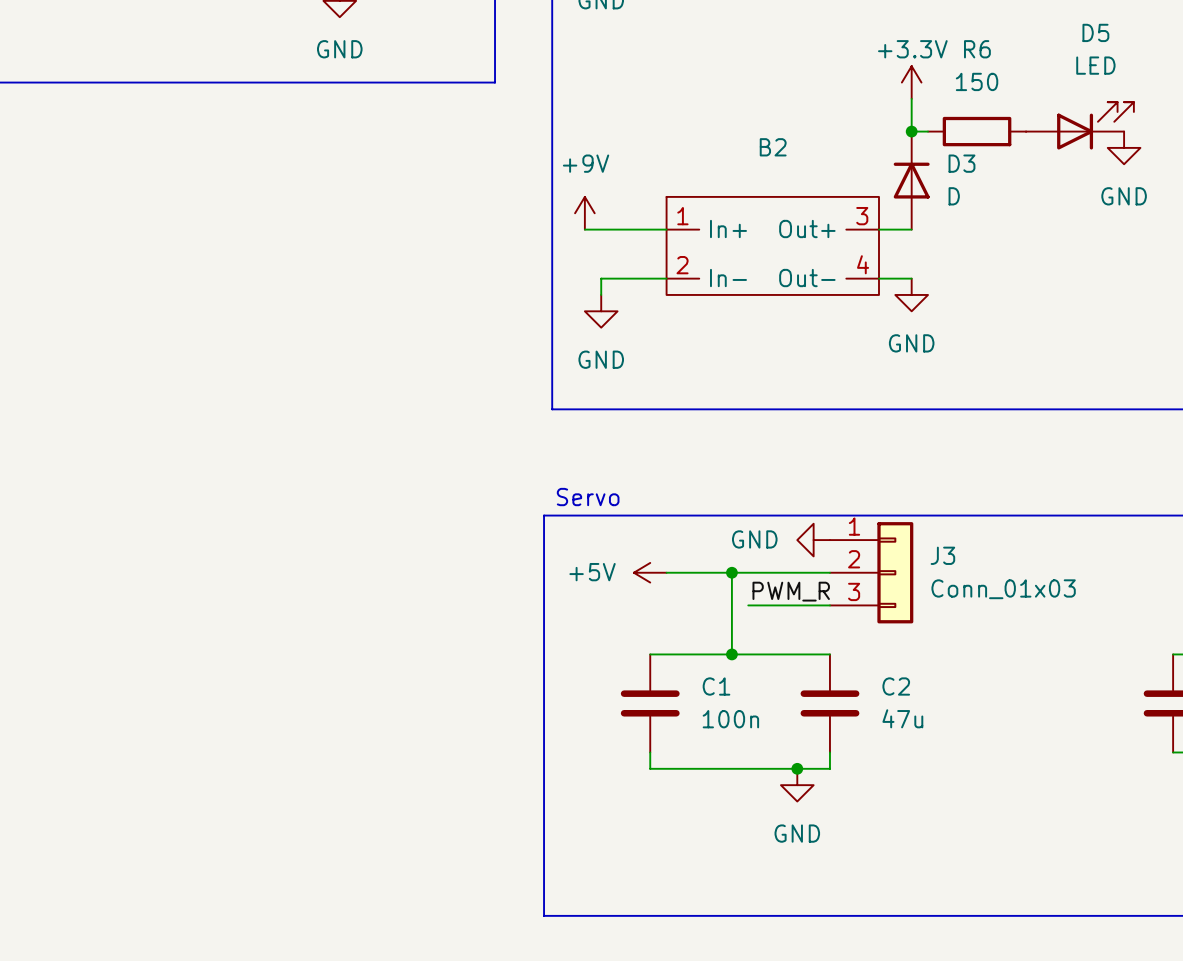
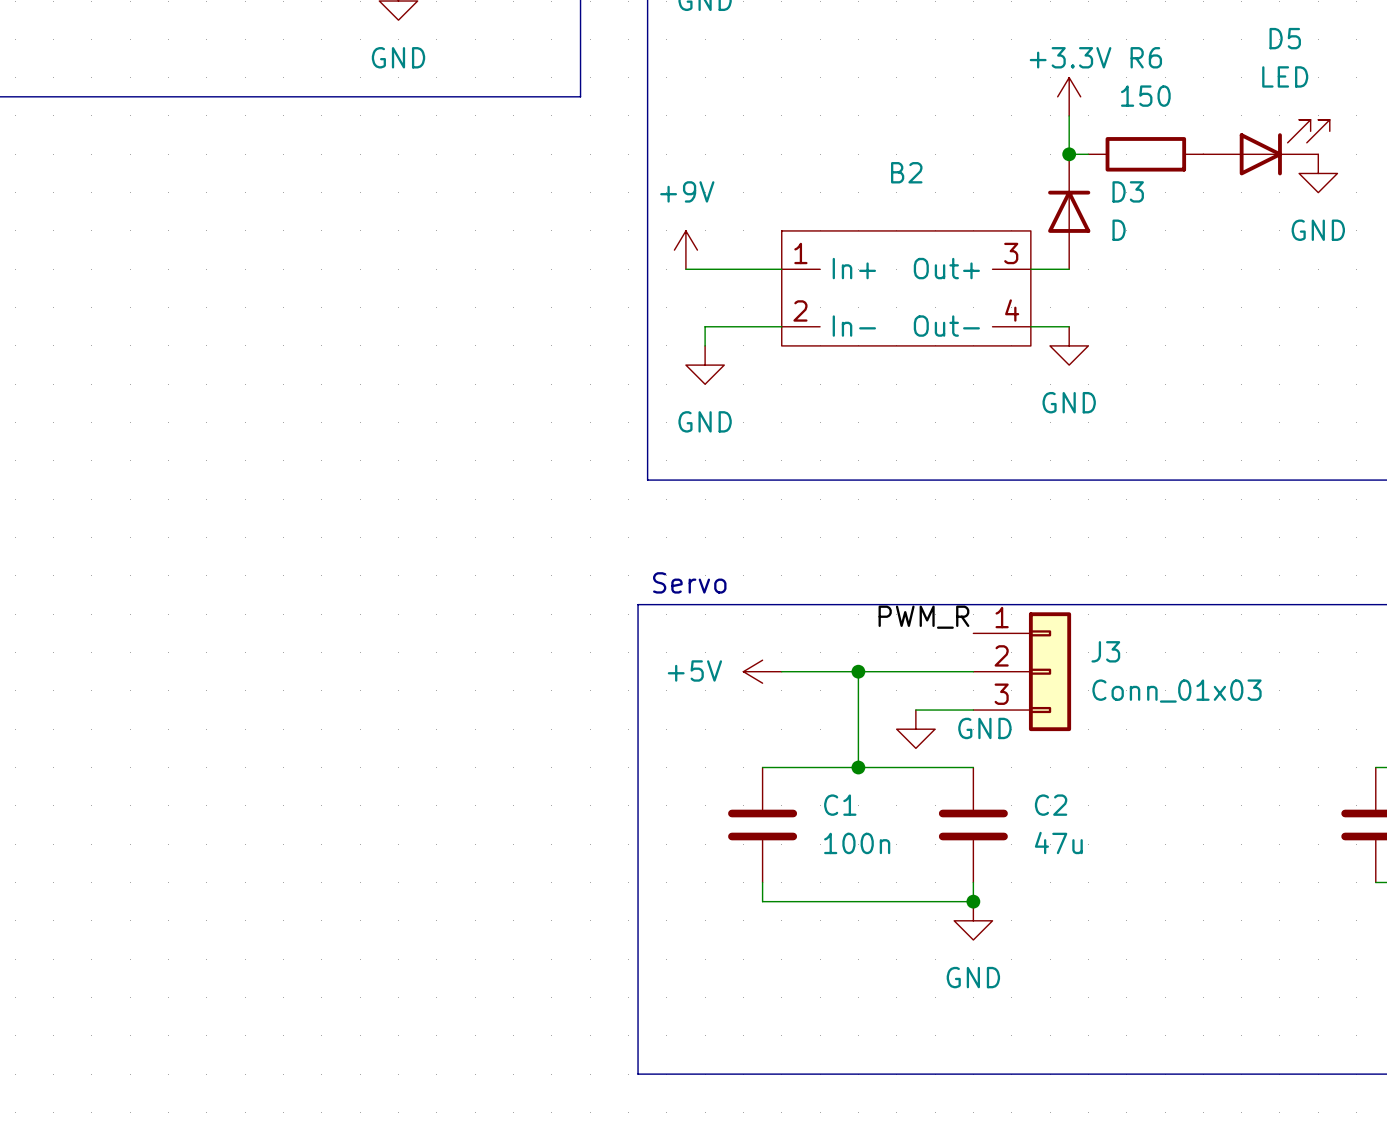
power symbol: GND (813, 540) -> none
label position: PWM_R (791, 591) -> PWM_R (923, 617)
wire: (748, 605) (780, 605) -> none
power symbol: none -> GND (915, 729)
junction position: (797, 768) -> (973, 901)
power symbol position: GND (797, 785) -> GND (973, 920)

